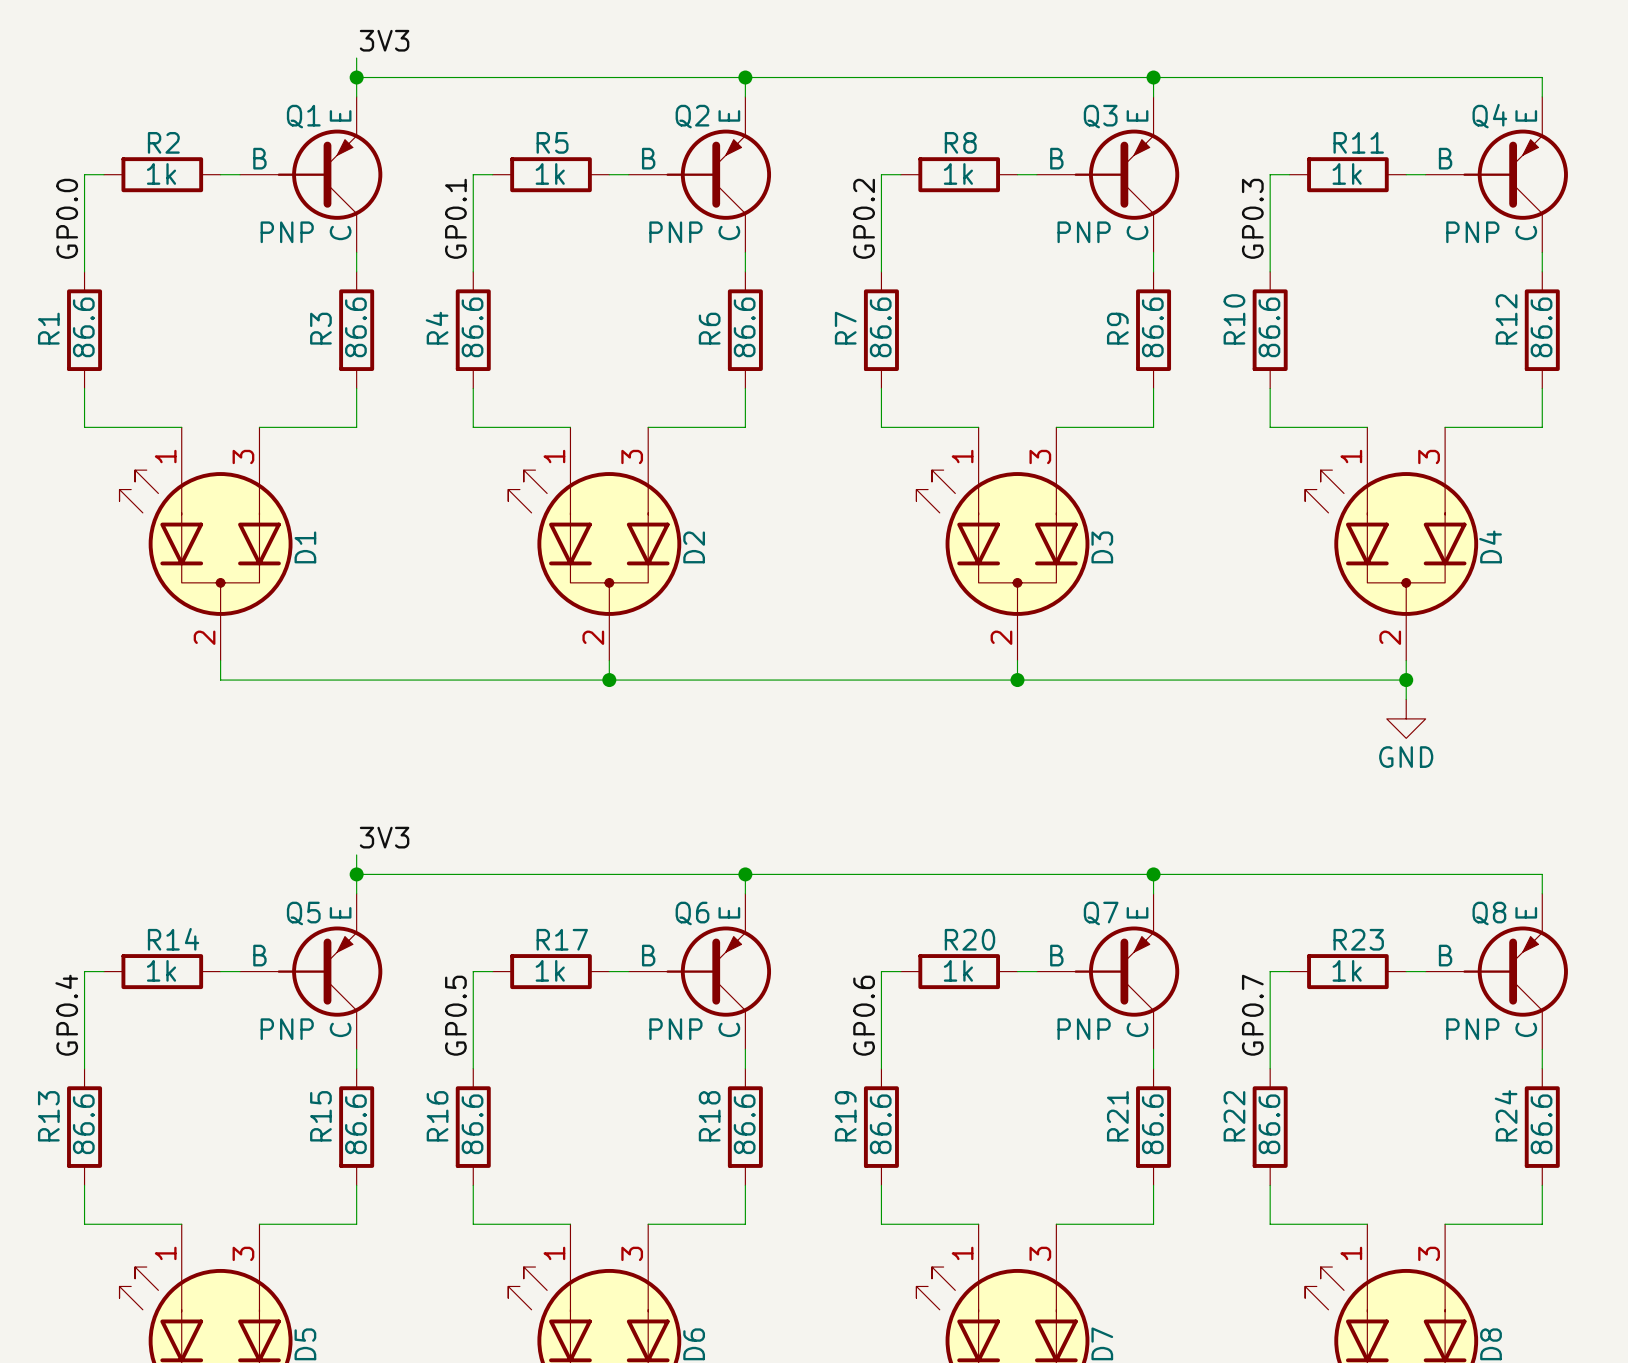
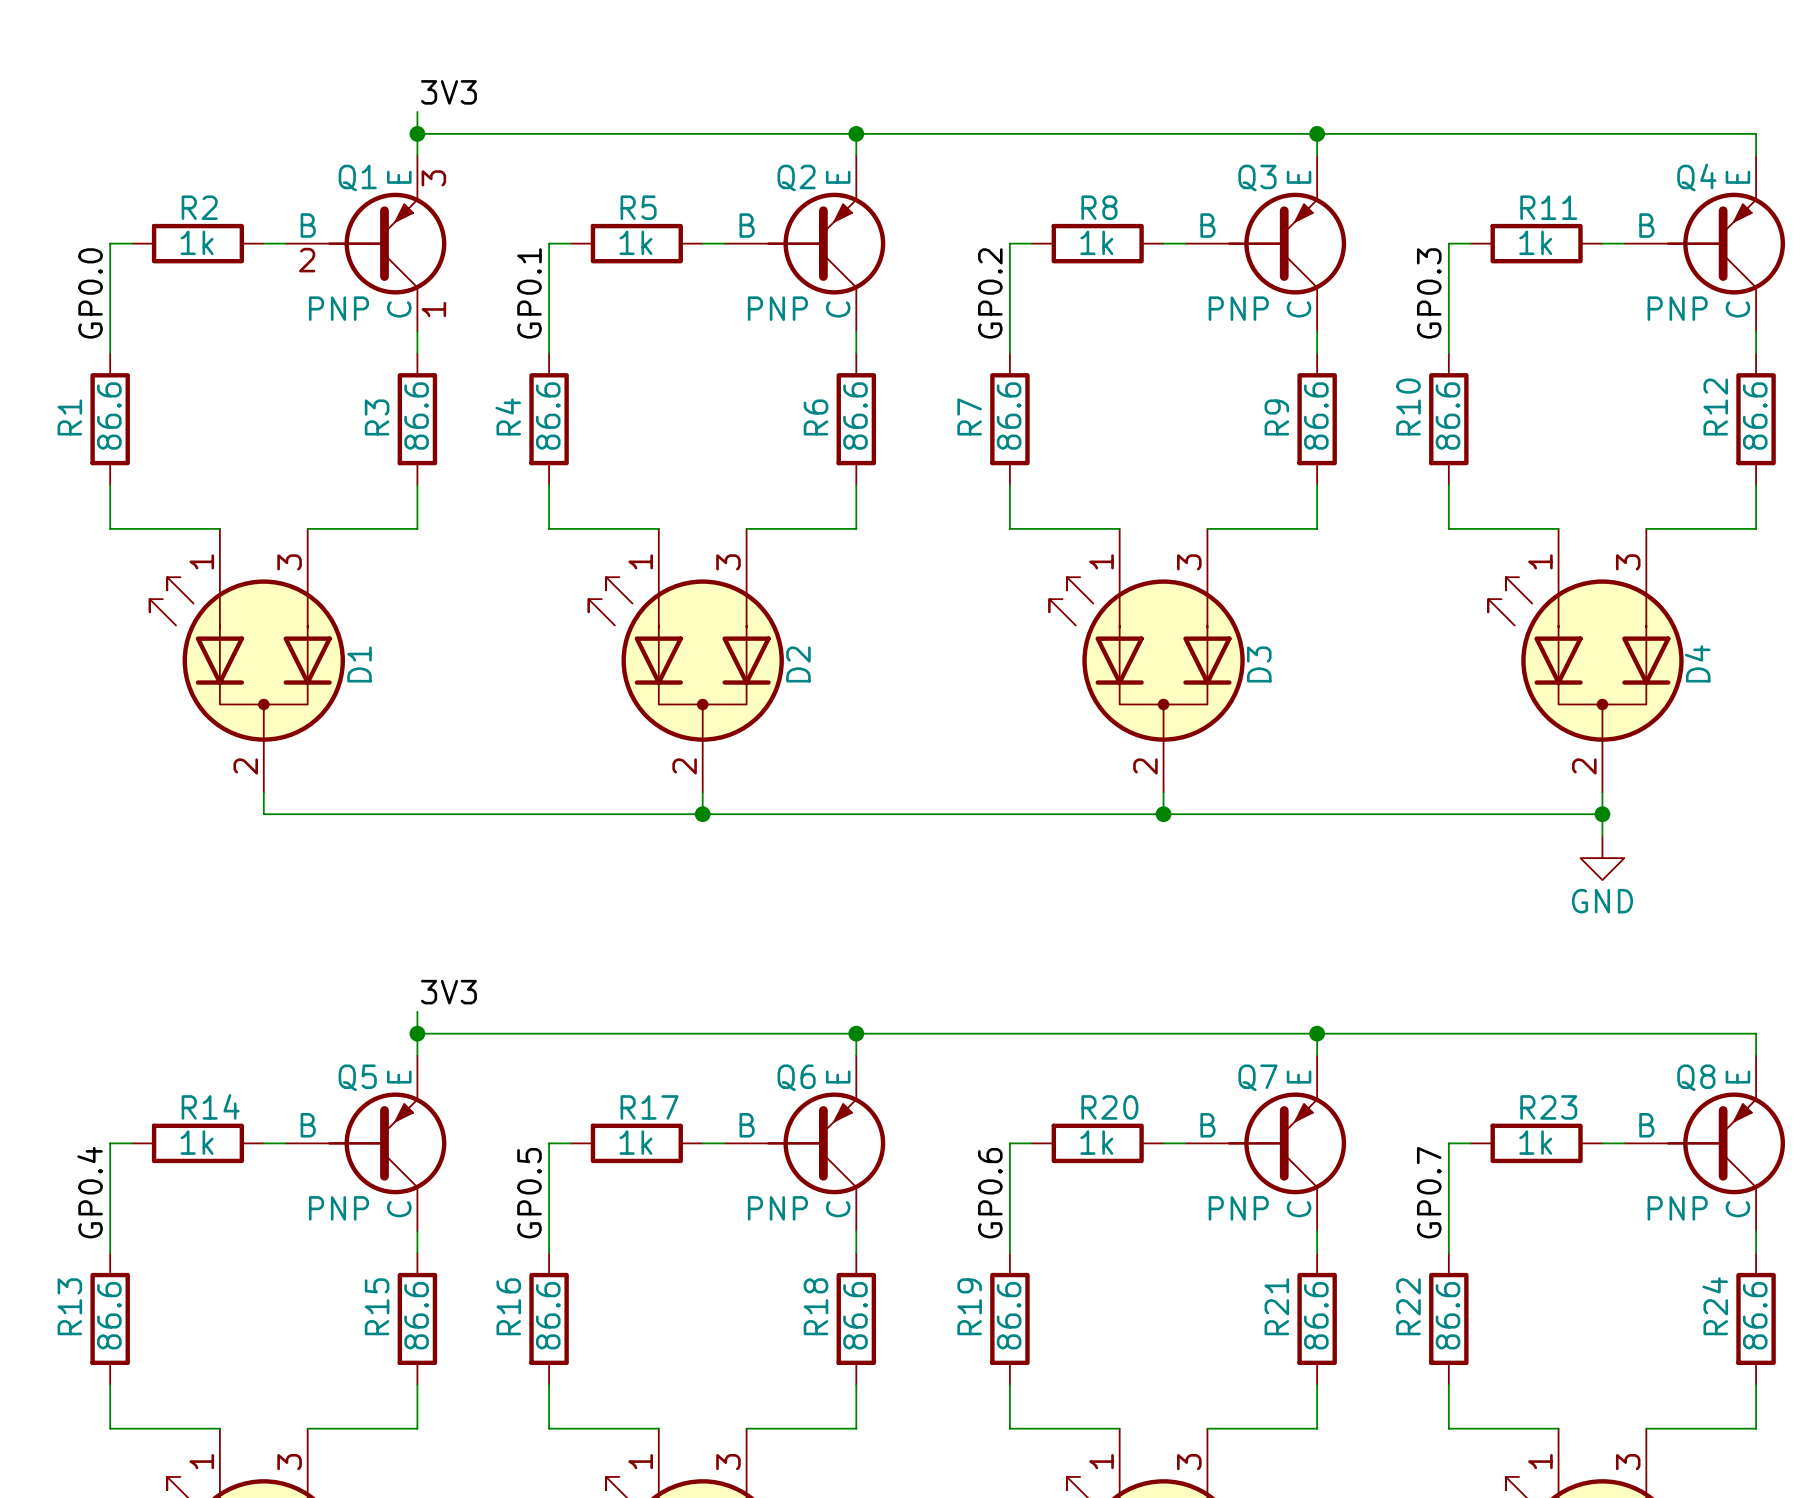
Q1 pin number: none -> 3 (433, 178)
Q1 pin number: none -> 2 (307, 260)
Q1 pin number: none -> 1 (433, 309)

